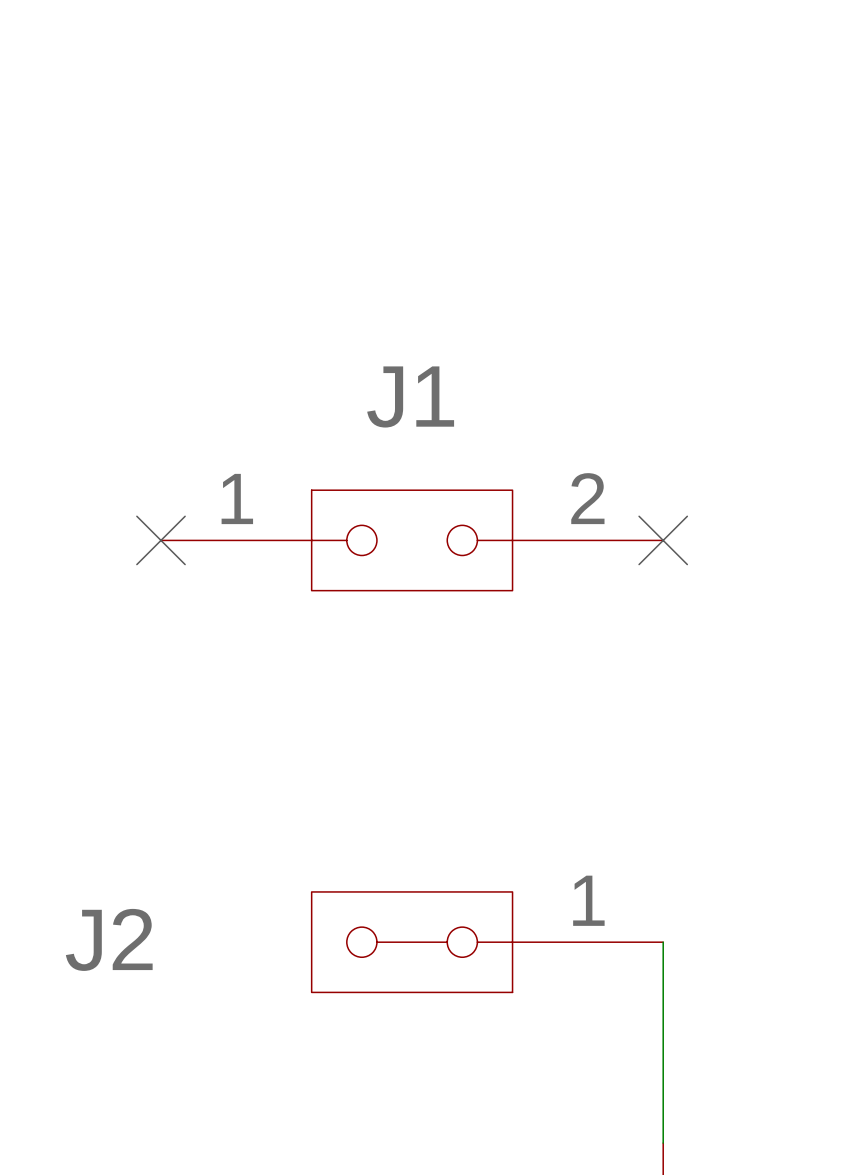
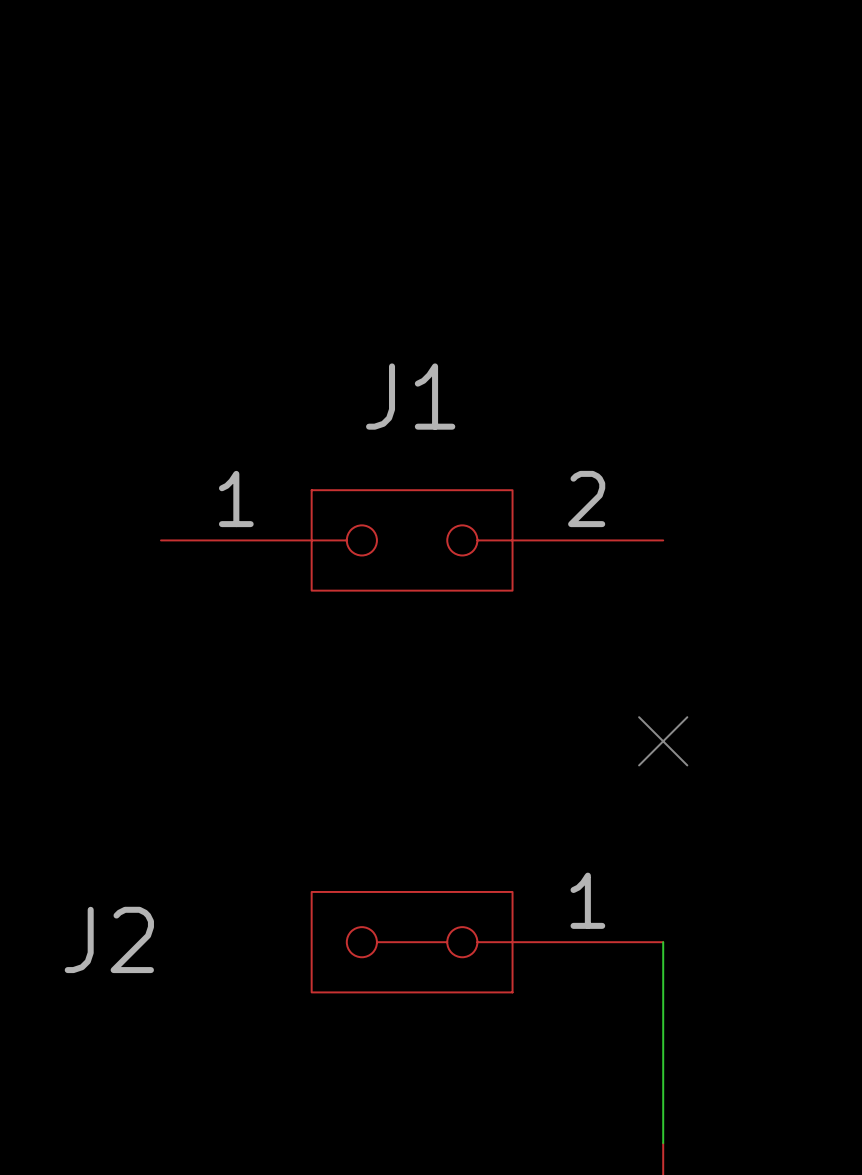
no-connect mark: (160, 540) -> none
no-connect mark position: (663, 540) -> (663, 741)

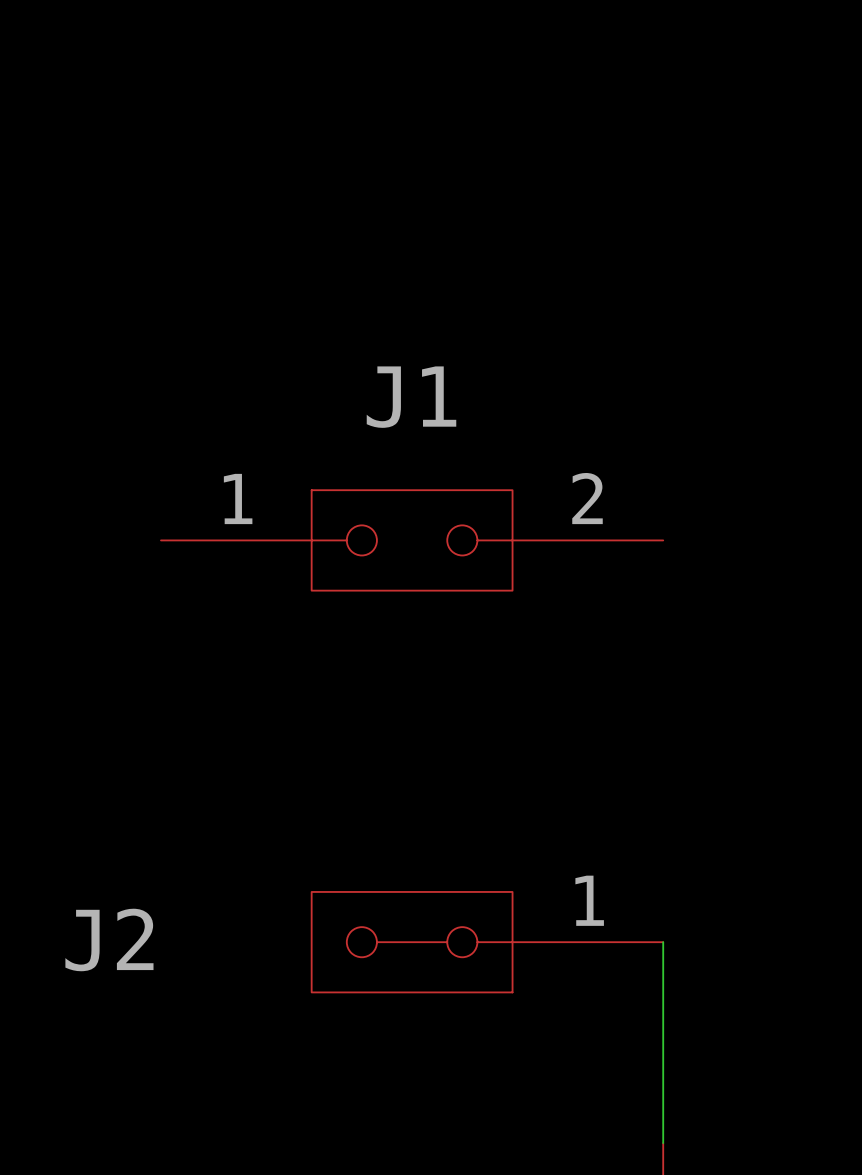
no-connect mark: (663, 741) -> none

